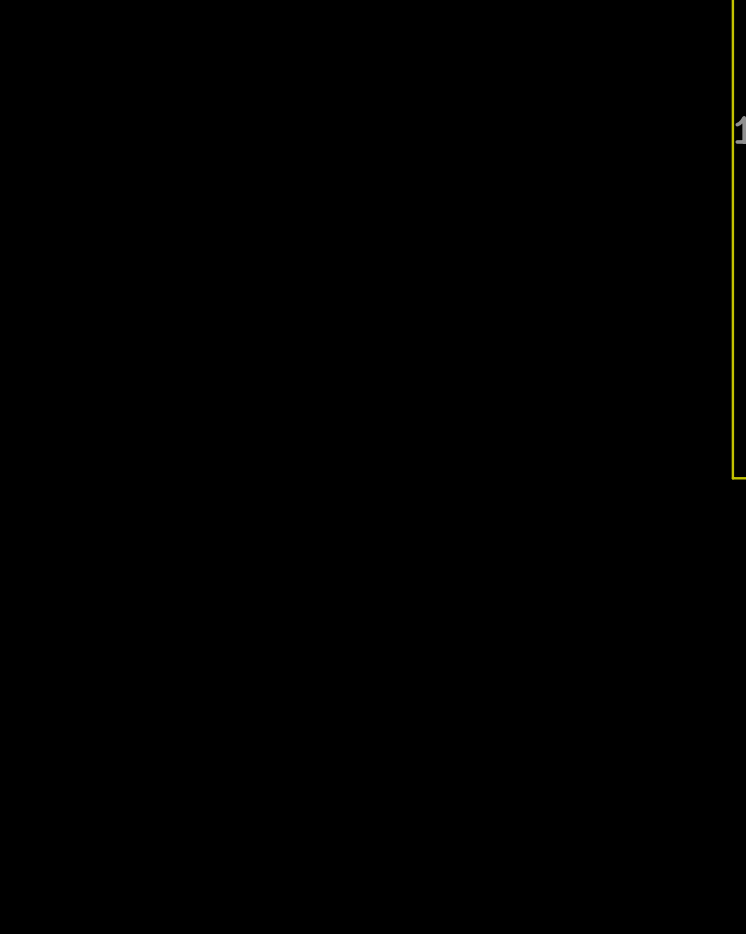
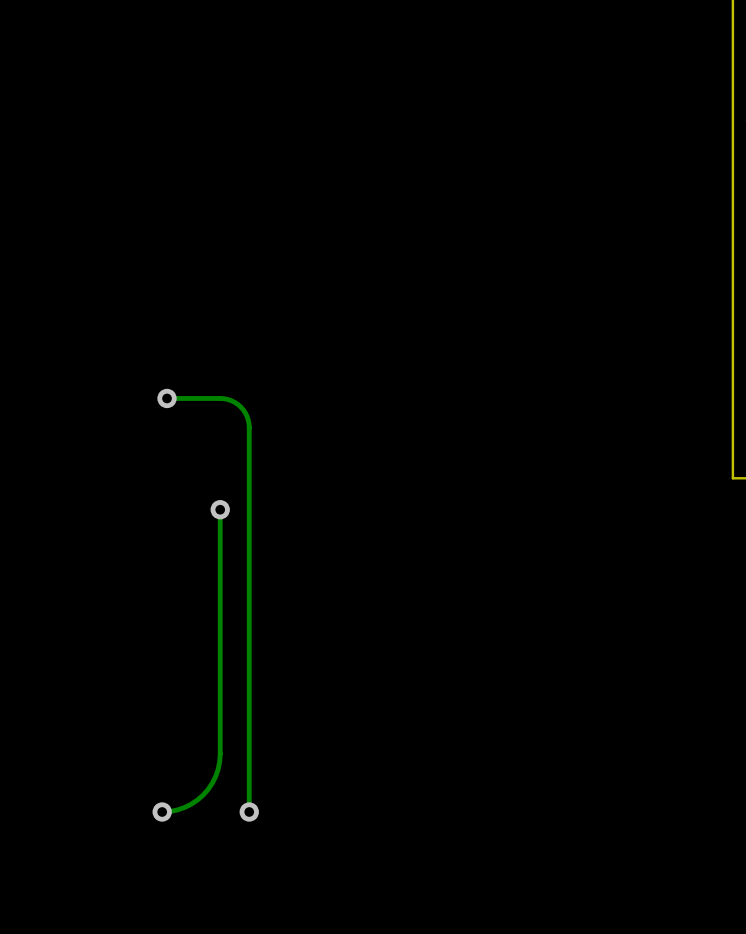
track: none -> (167, 398) (227, 399) (240, 406) (249, 423) (249, 811)
via: none -> (167, 398)
track: none -> (220, 509) (219, 761) (215, 776) (203, 794) (184, 807) (162, 811)
via: none -> (220, 509)
via: none -> (162, 811)
via: none -> (249, 811)

